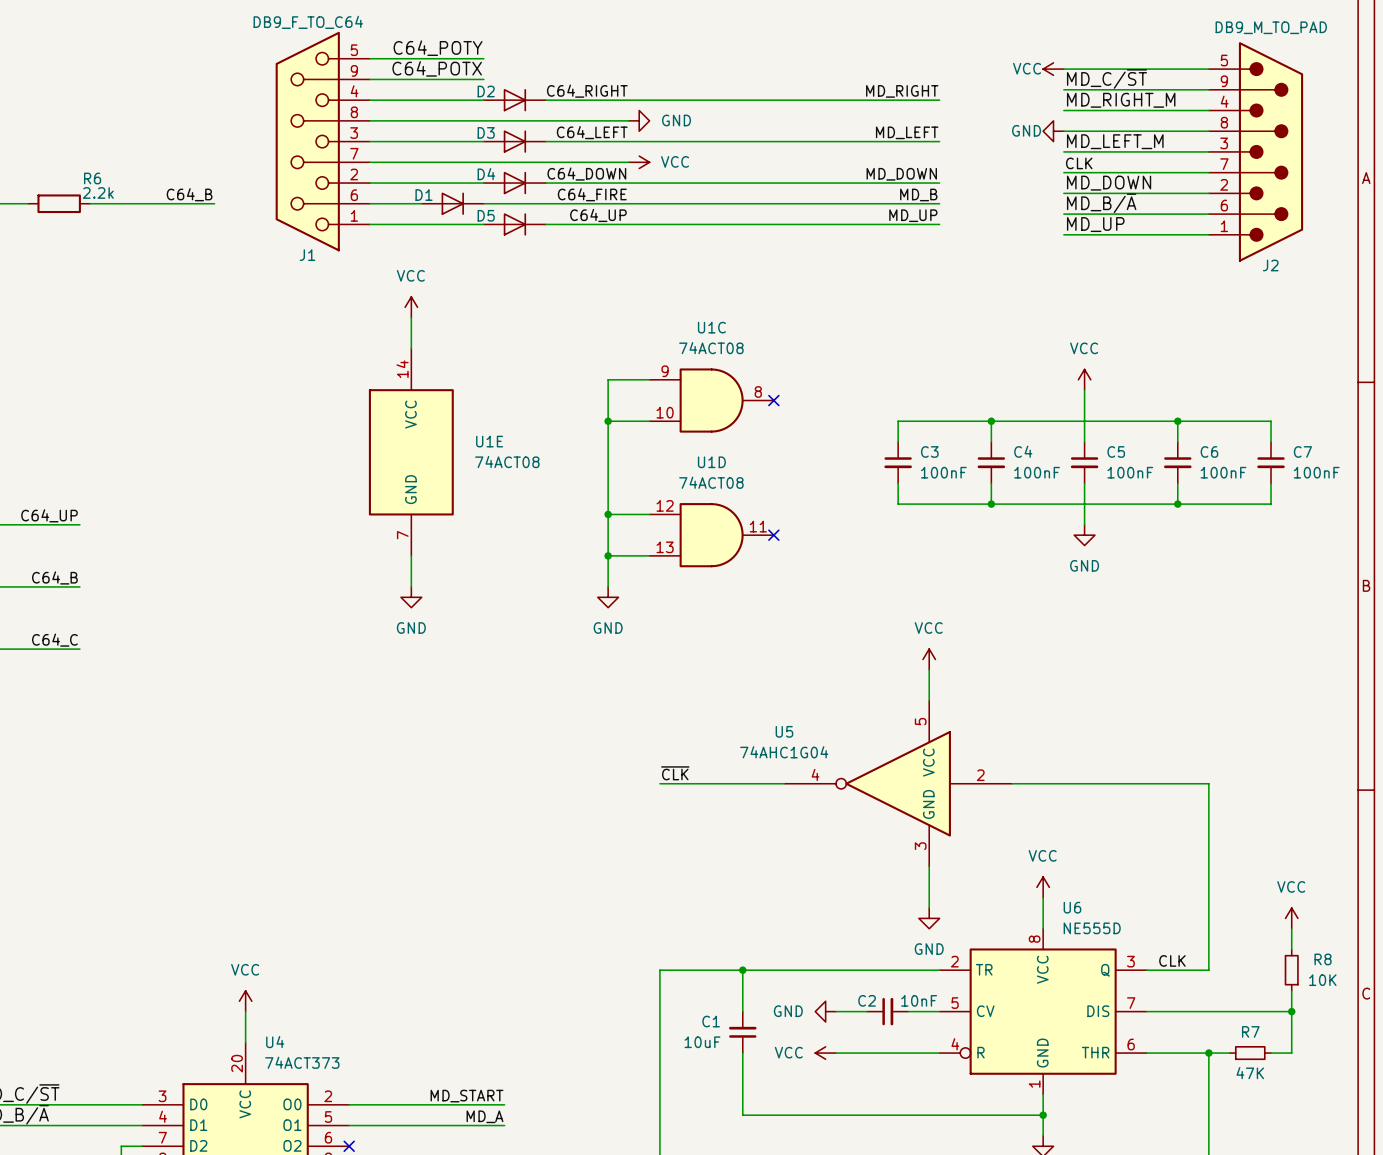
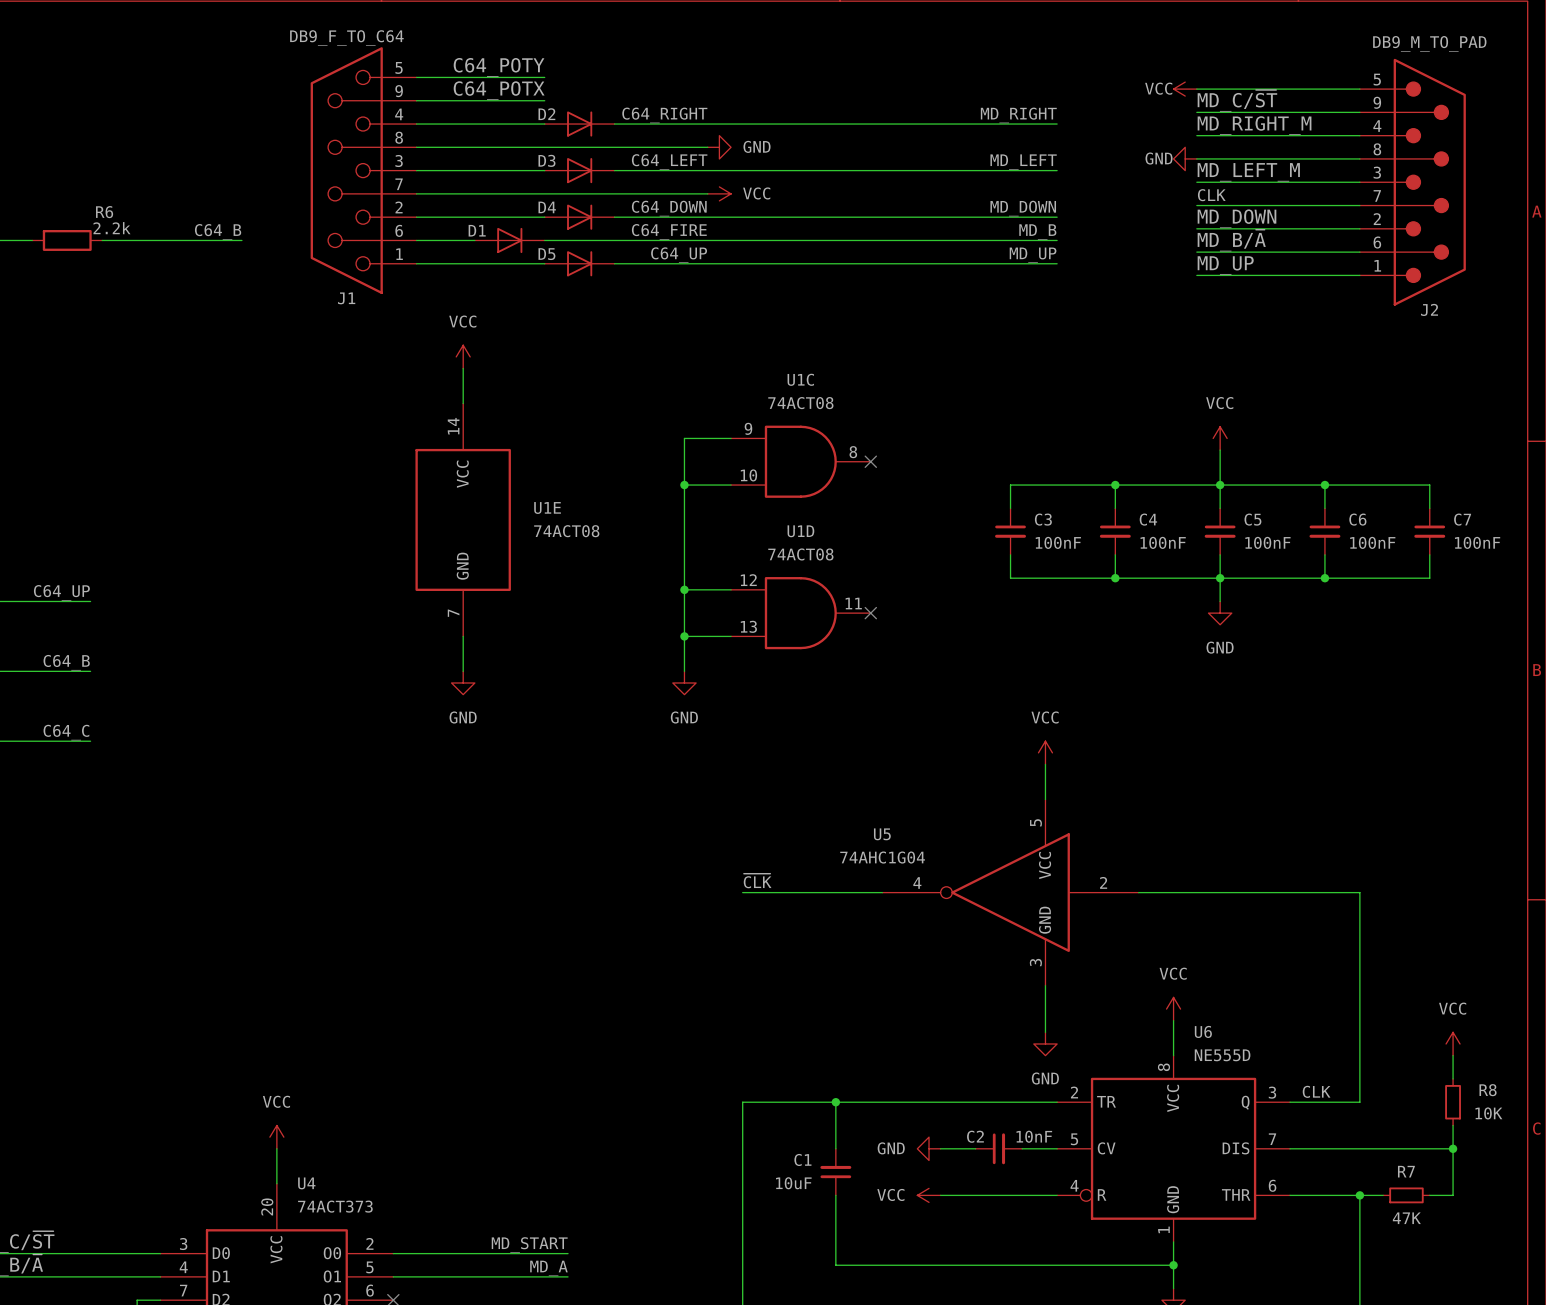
junction: none -> (1220, 485)
junction: none -> (1220, 578)

